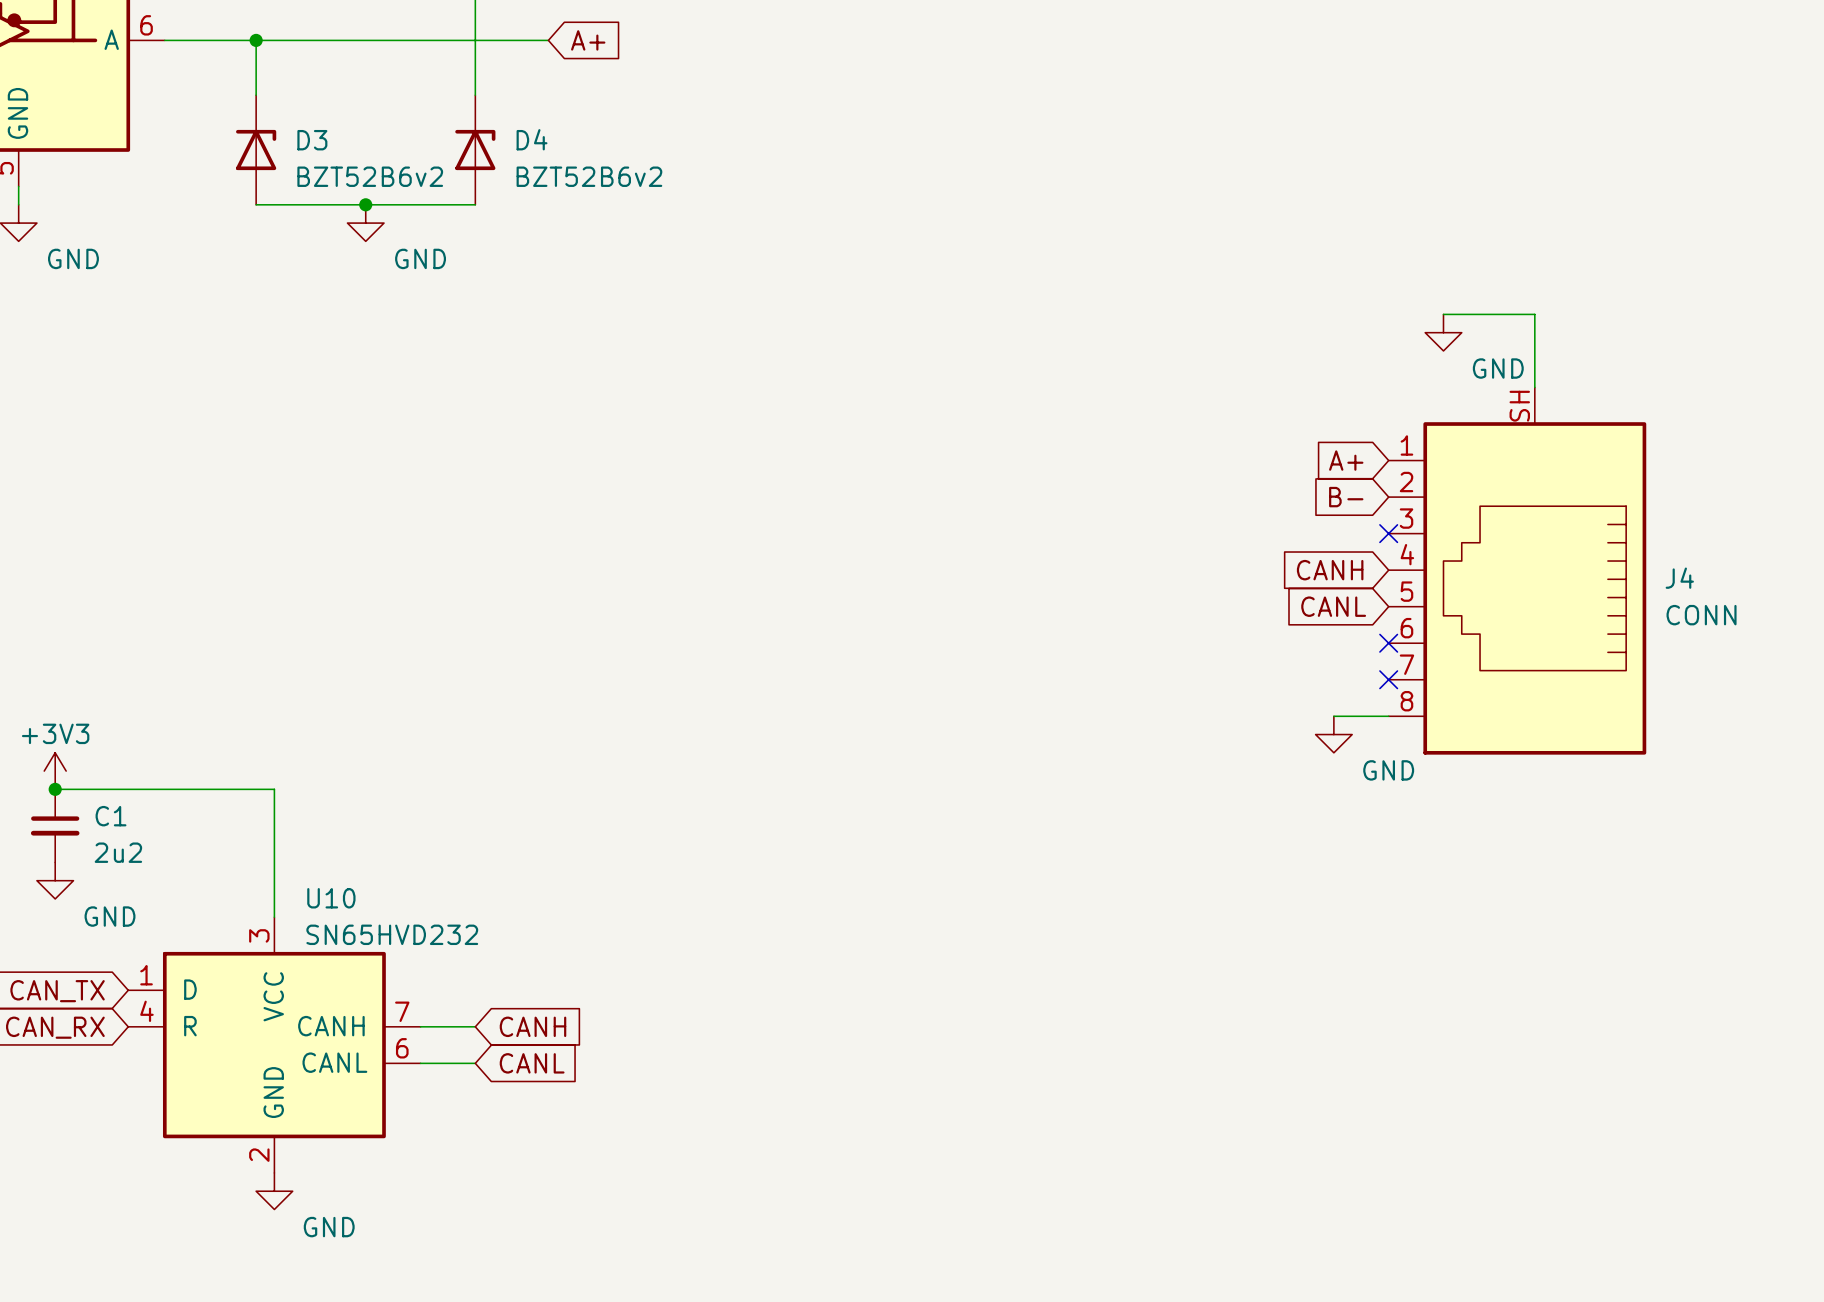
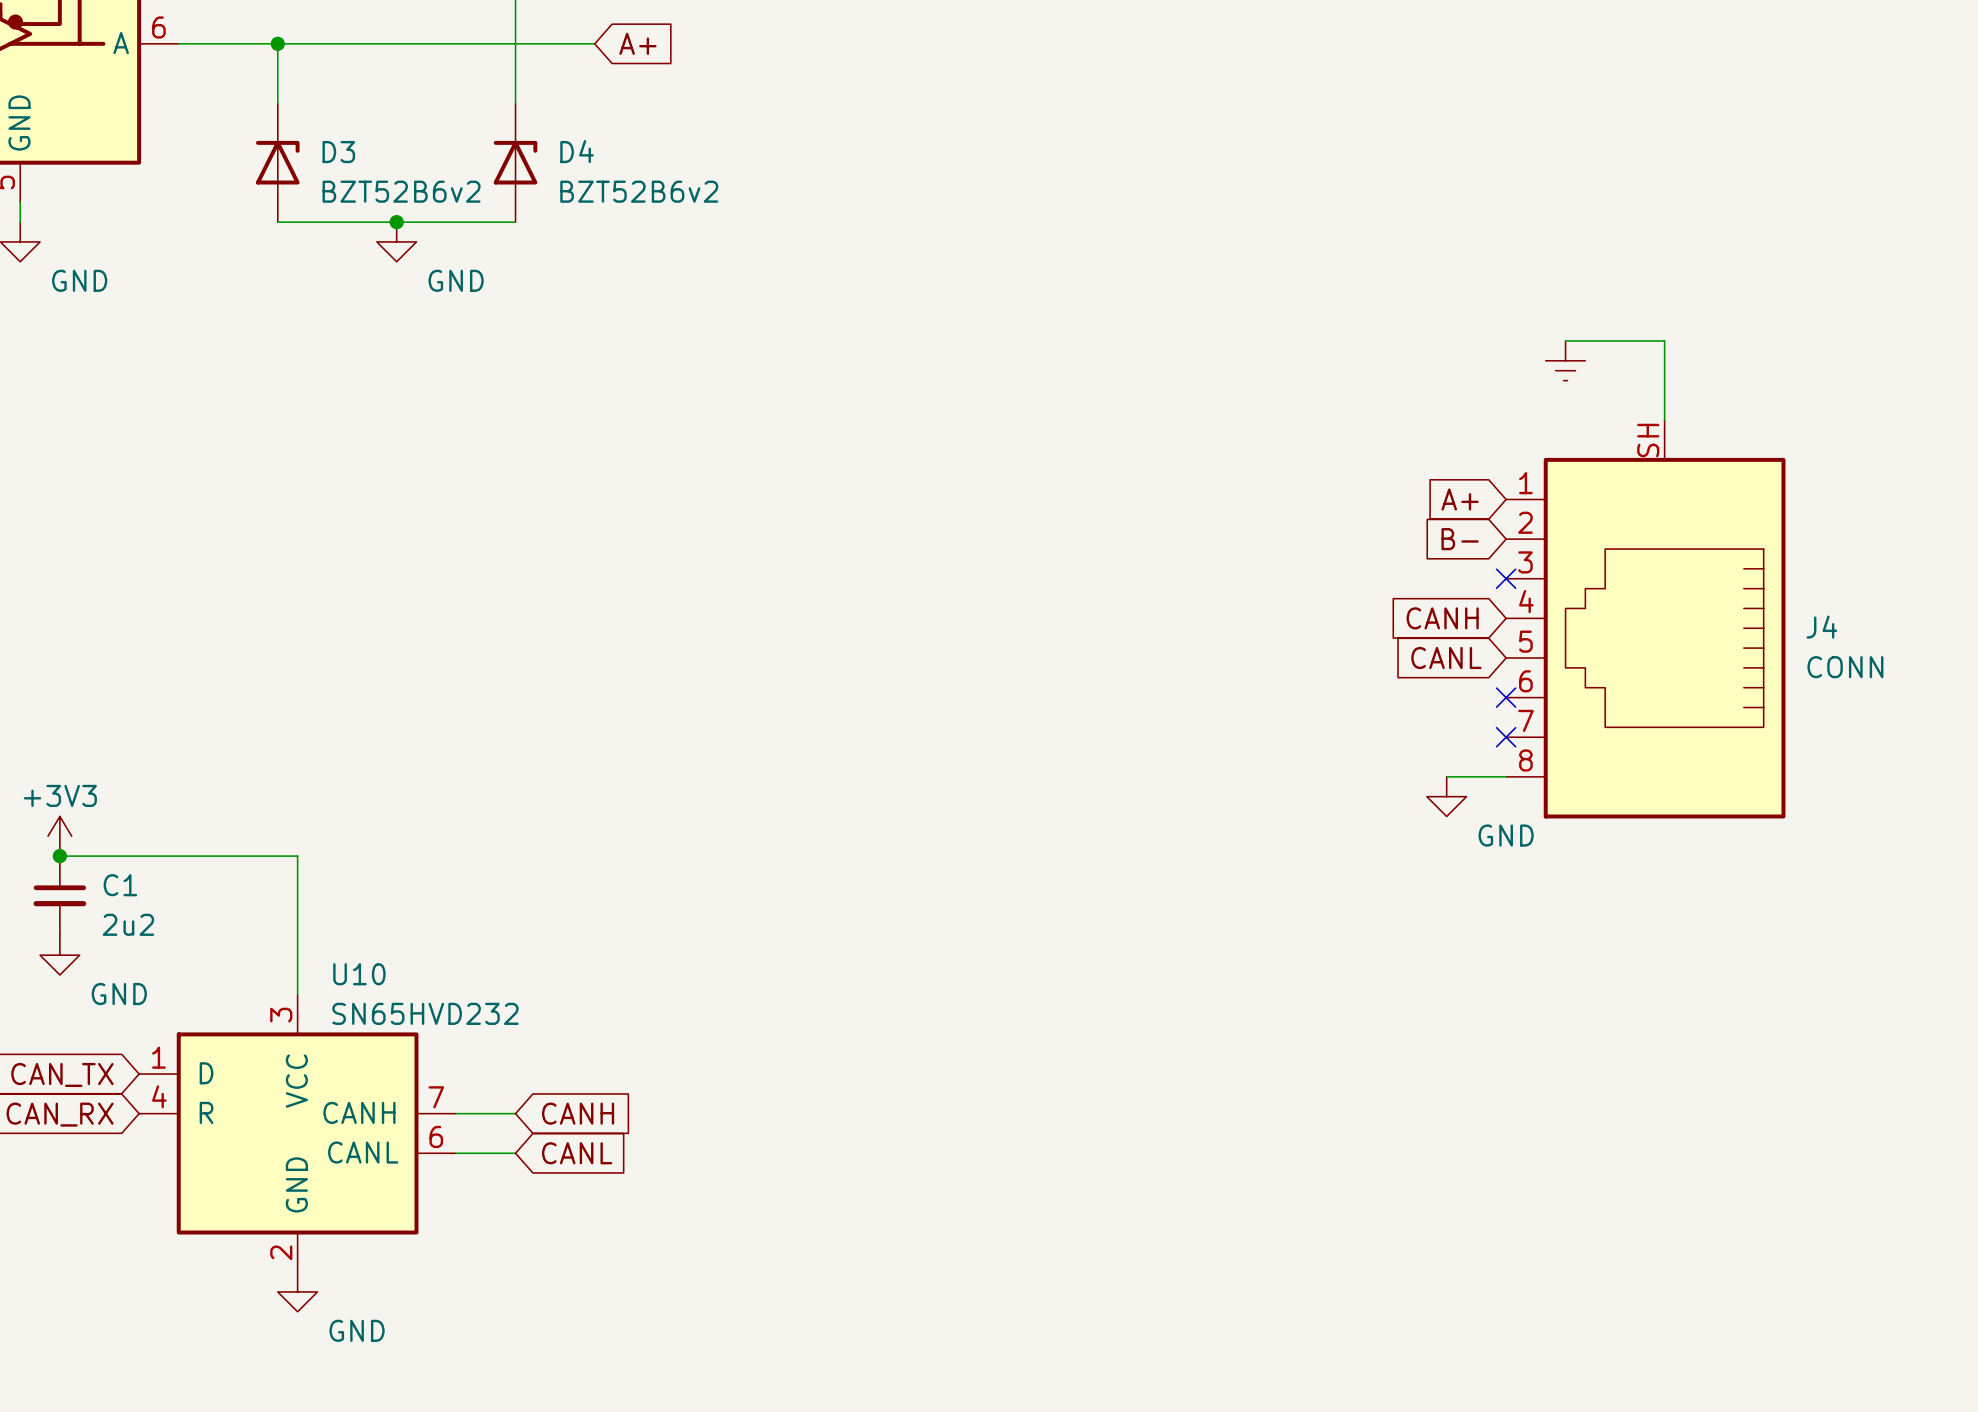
power symbol shape: [1425, 314, 1462, 351] -> [1545, 341, 1586, 381]
power symbol text: GND (1498, 368) -> none

